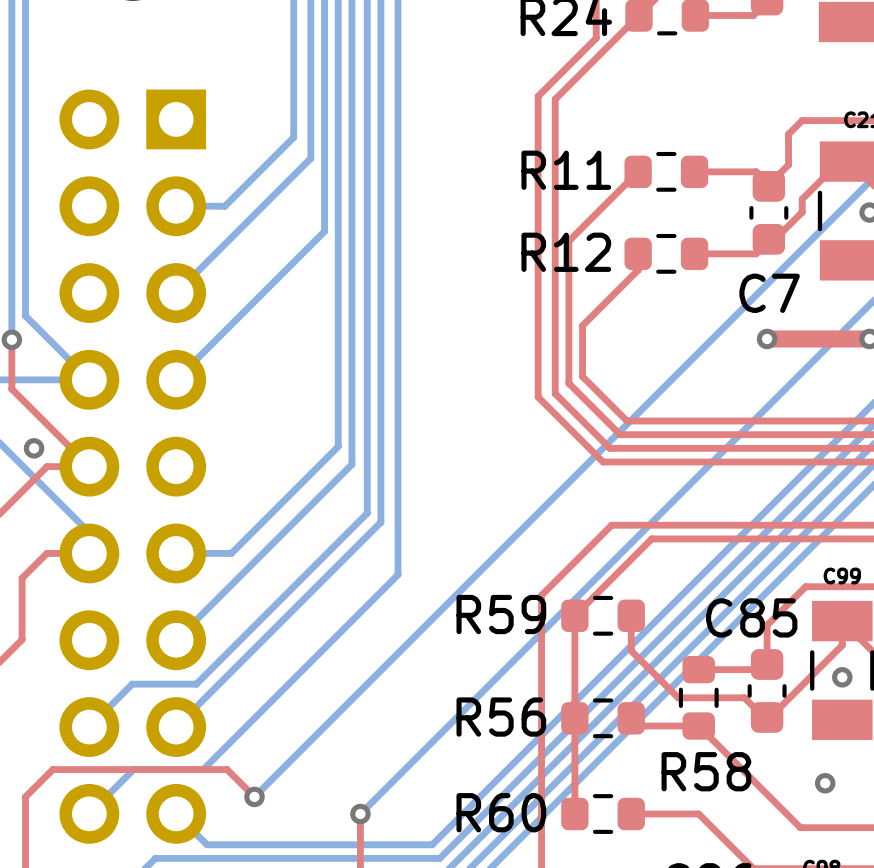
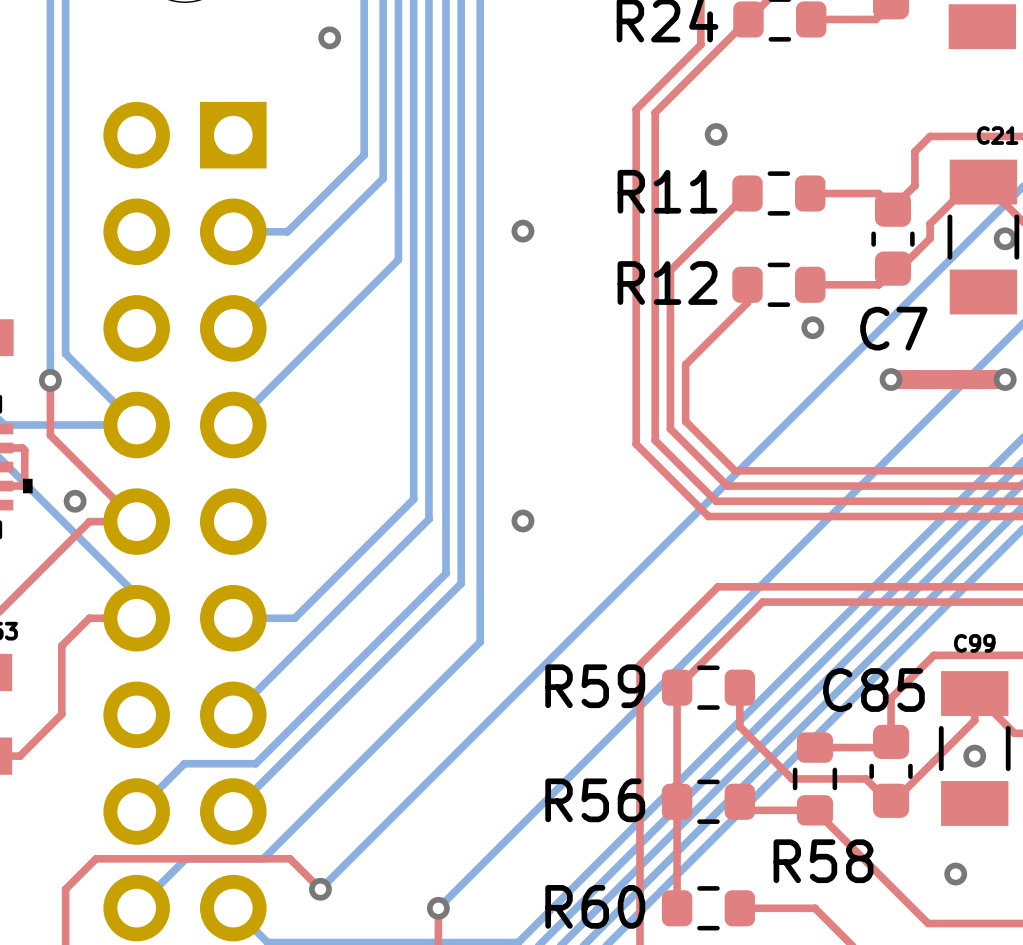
via: none -> (329, 37)
via: none -> (716, 134)
via: none -> (522, 231)
via: none -> (812, 327)
via: none -> (522, 520)

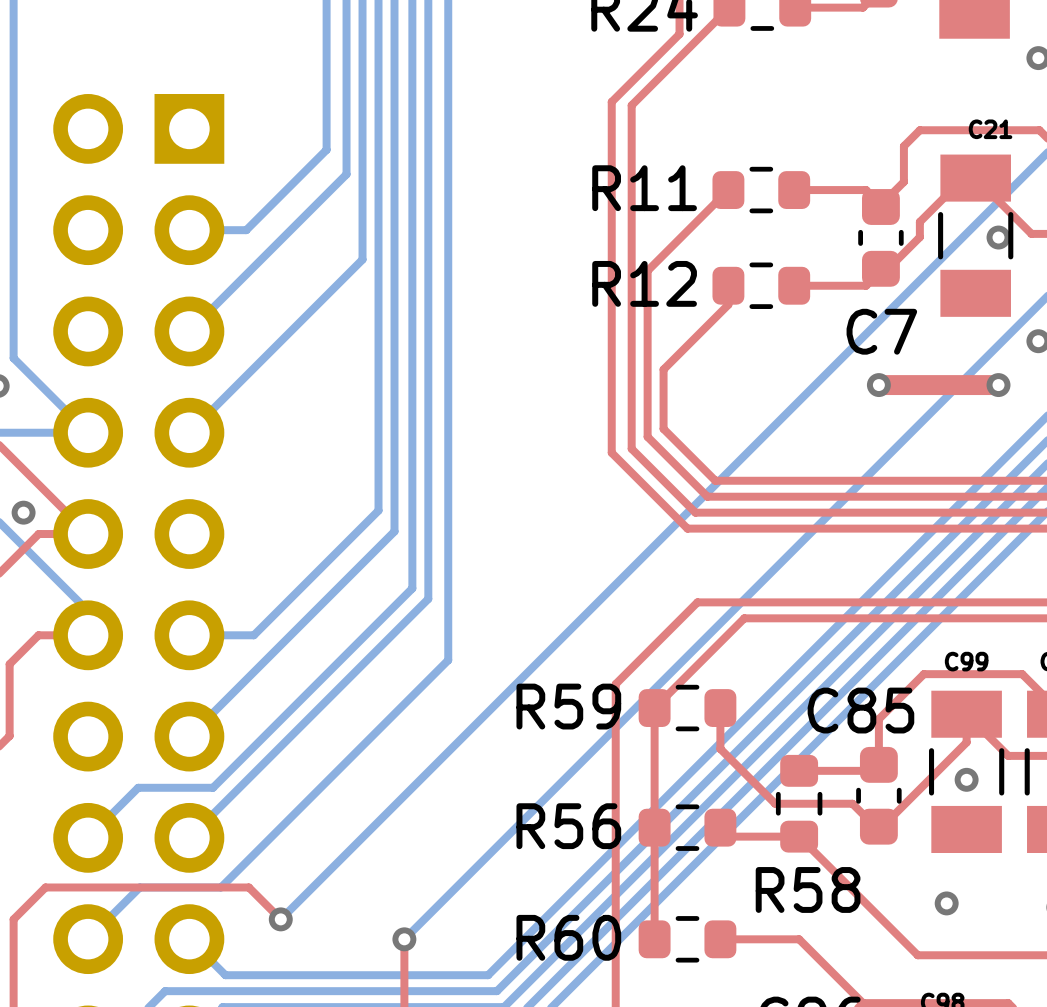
via: (329, 37) -> none
via: (716, 134) -> none
via: (522, 231) -> none
via: (812, 327) -> none
via: (522, 520) -> none

